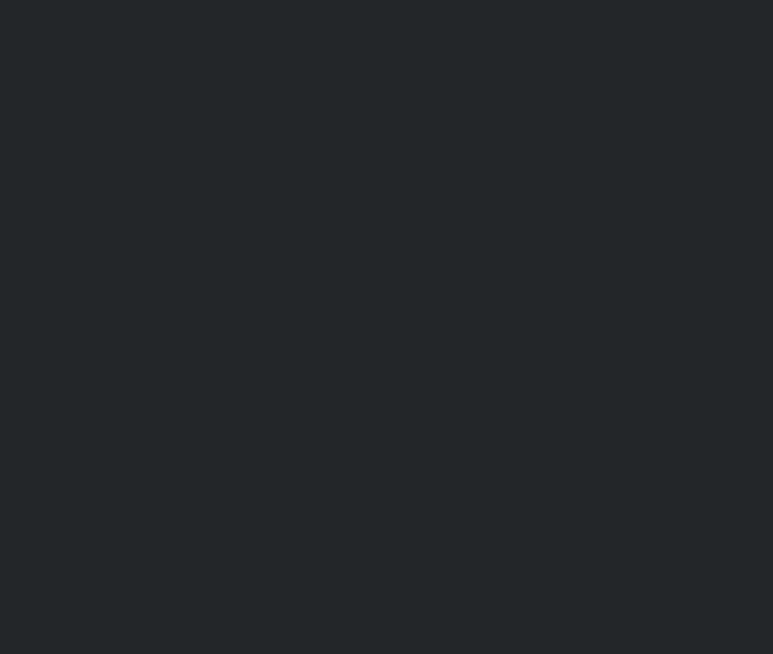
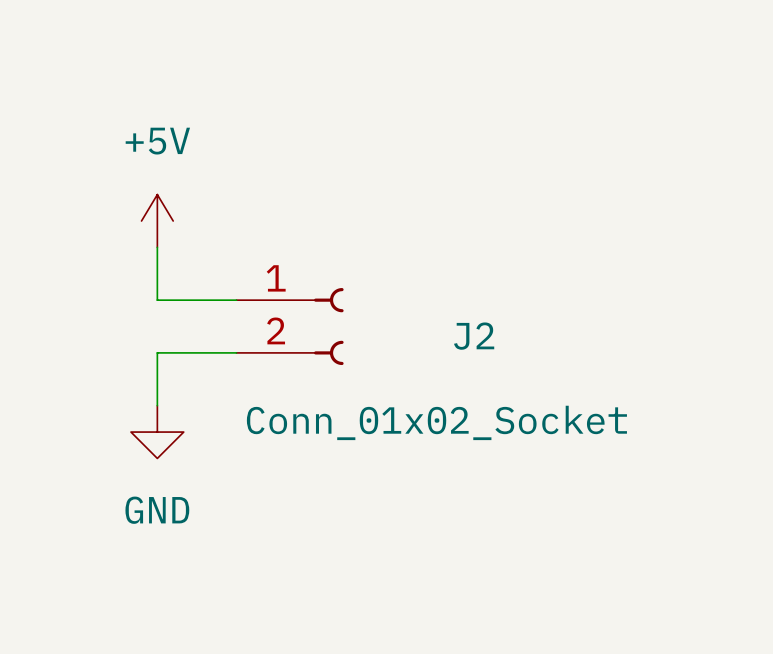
power symbol: none -> +5V (157, 221)
wire: none -> (157, 247) (157, 300) (236, 300)
J2: none -> Conn_01x02_Socket (290, 326)
wire: none -> (236, 352) (157, 352) (157, 405)
power symbol: none -> GND (157, 432)

